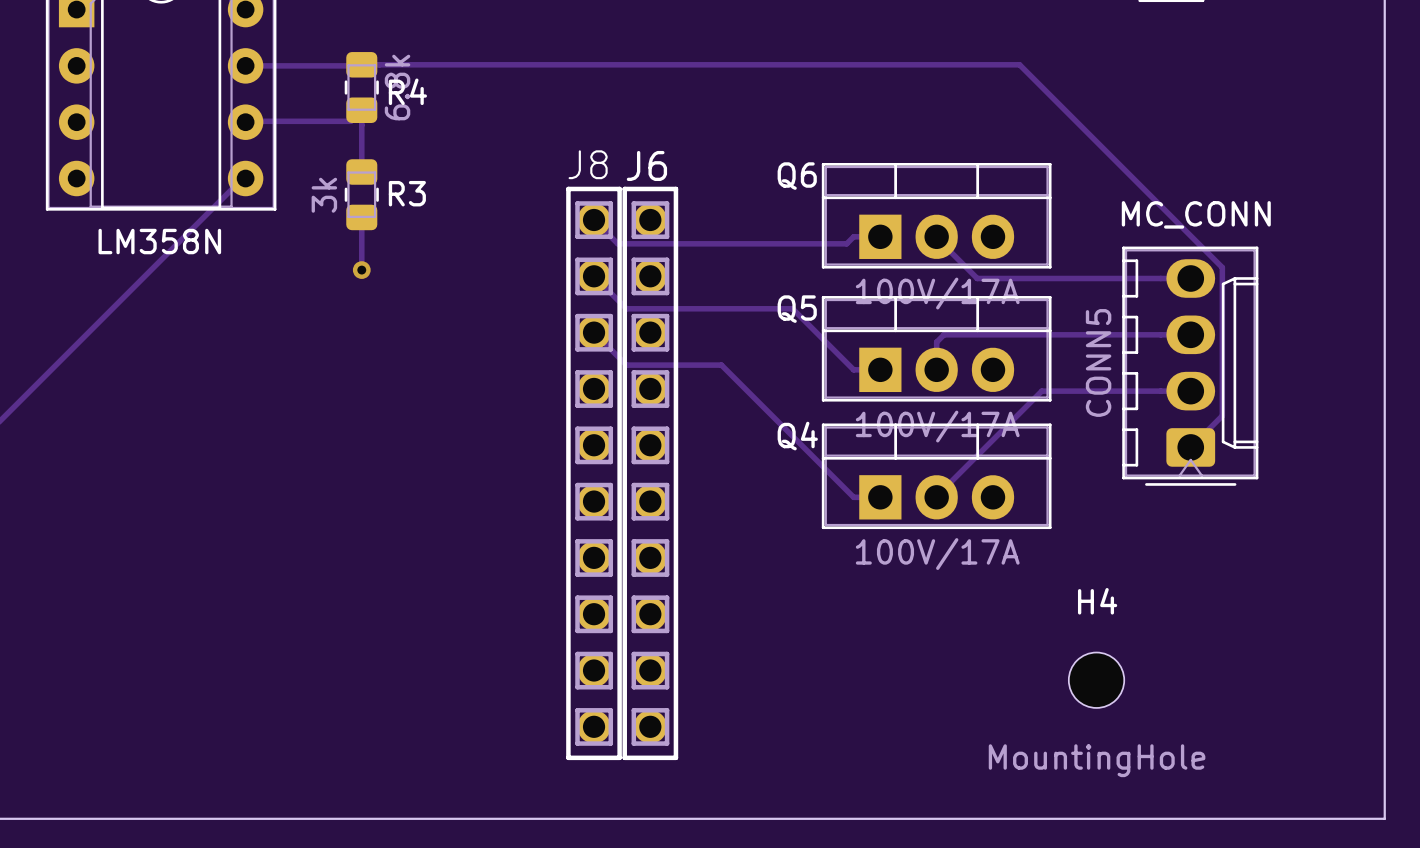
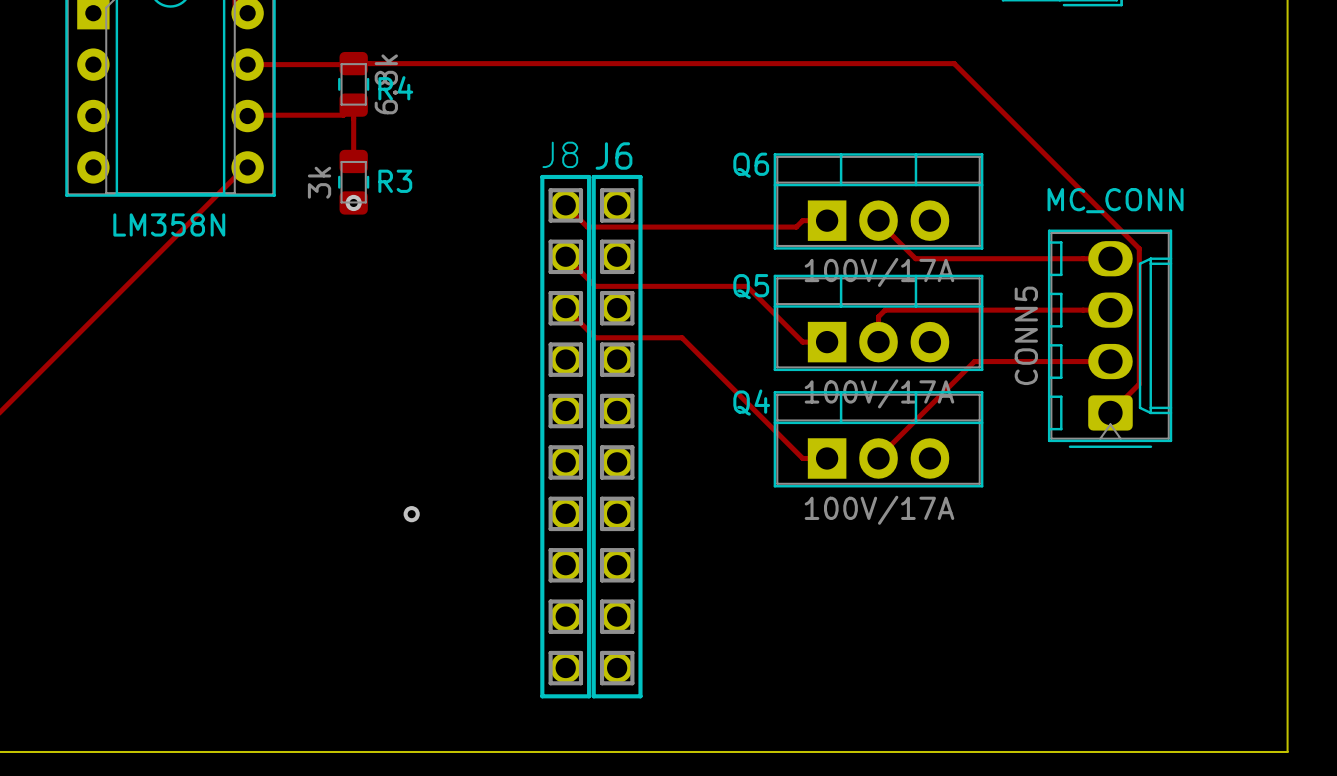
track: (361, 217) (361, 270) -> none
via position: (361, 270) -> (353, 202)
via: none -> (411, 514)
H4: MountingHole (1096, 680) -> none

